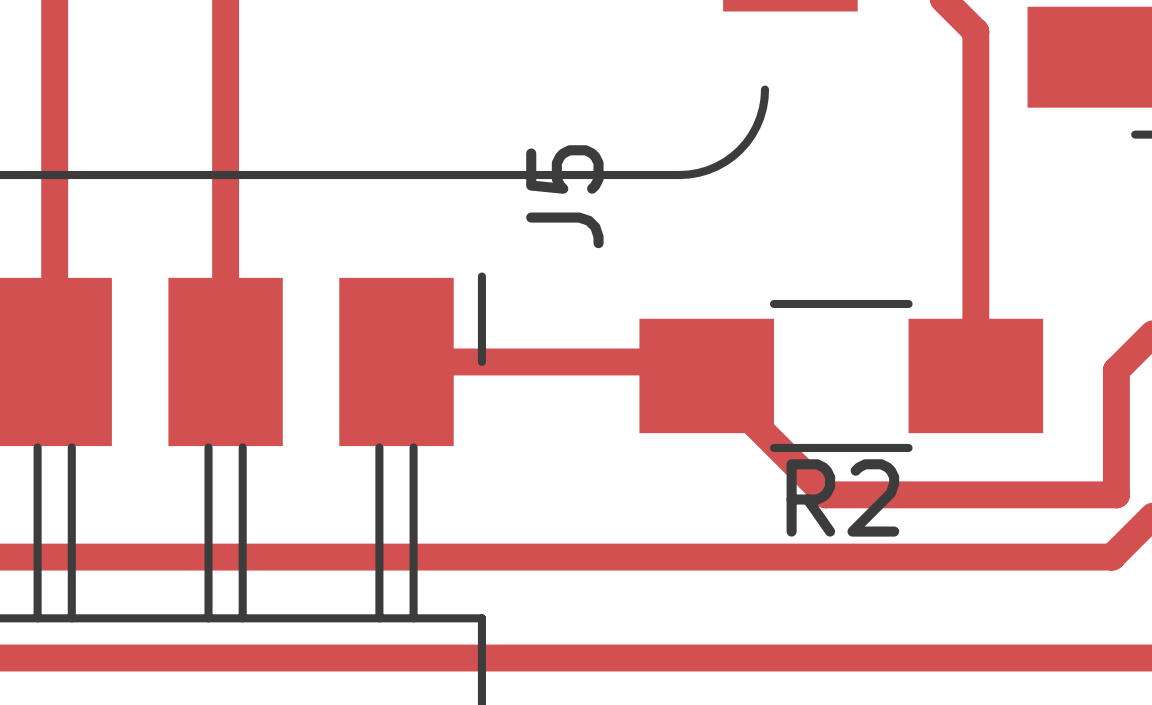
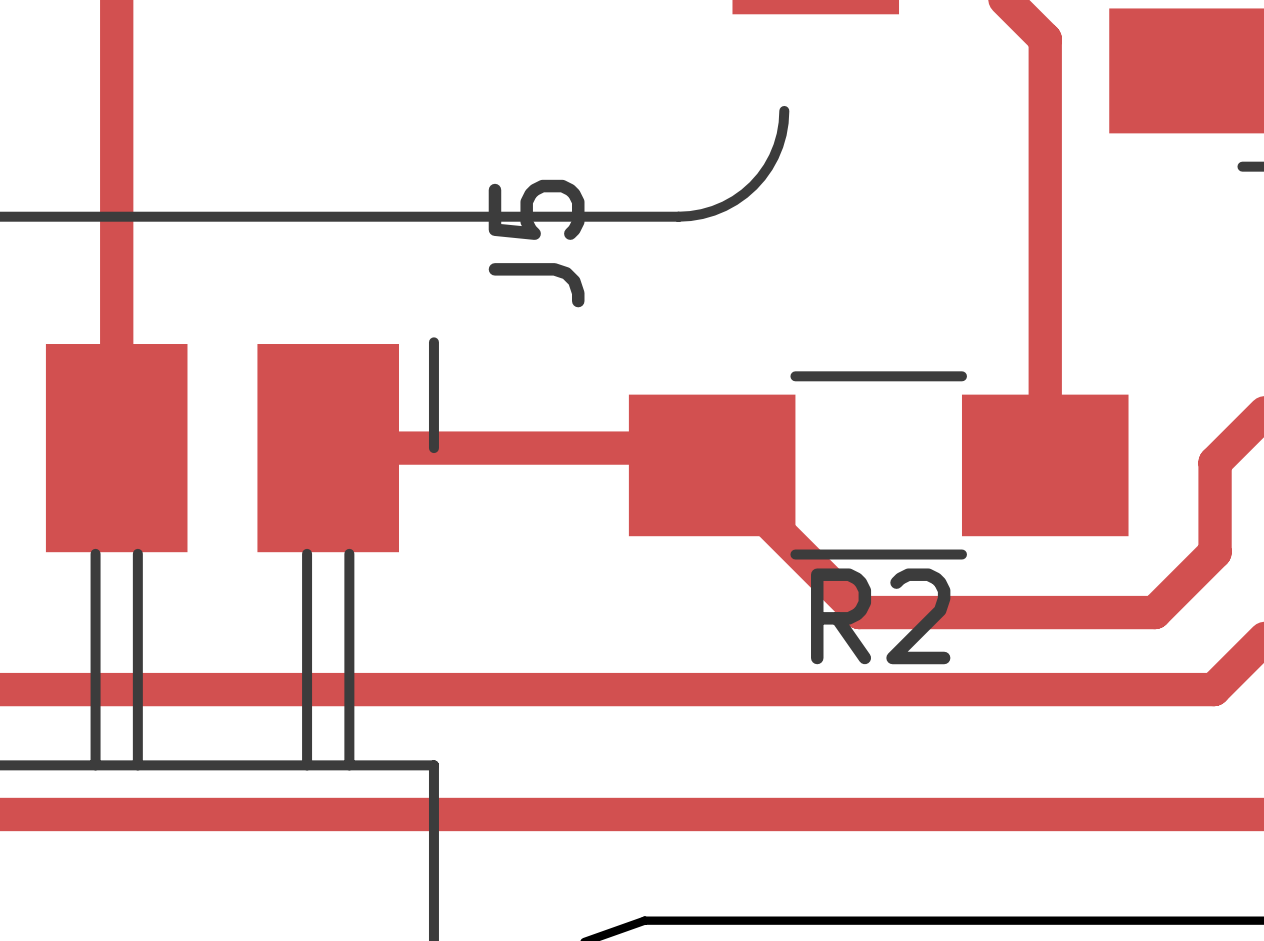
top track: (1116, 370) (1116, 494) (1064, 494) -> (1219, 458) (1215, 462) (1215, 552) (1154, 612)

